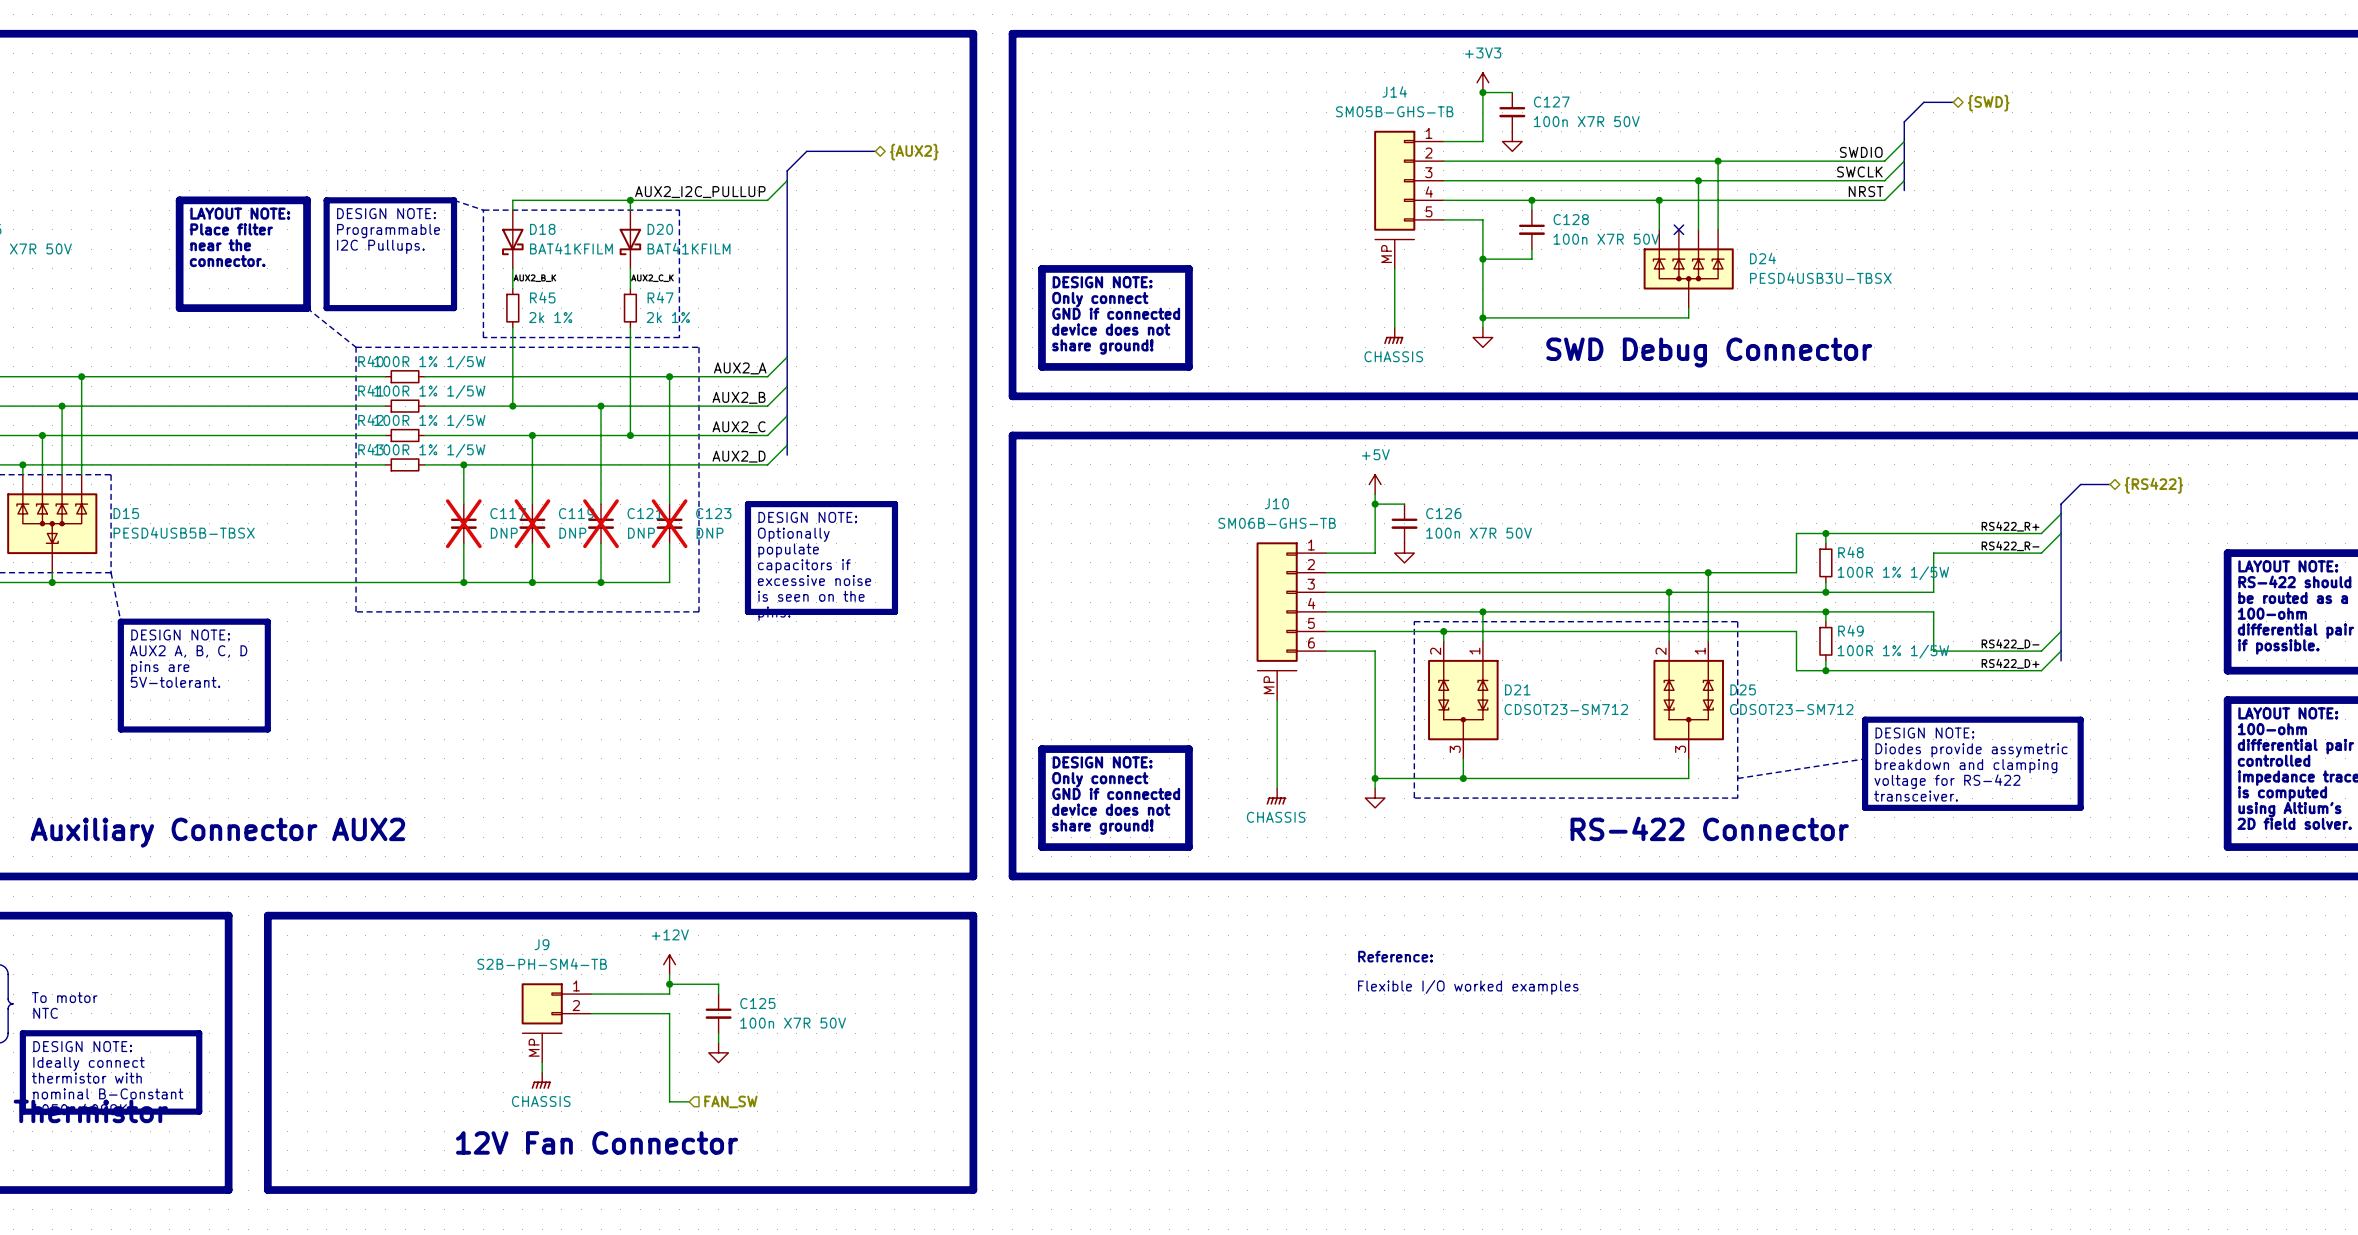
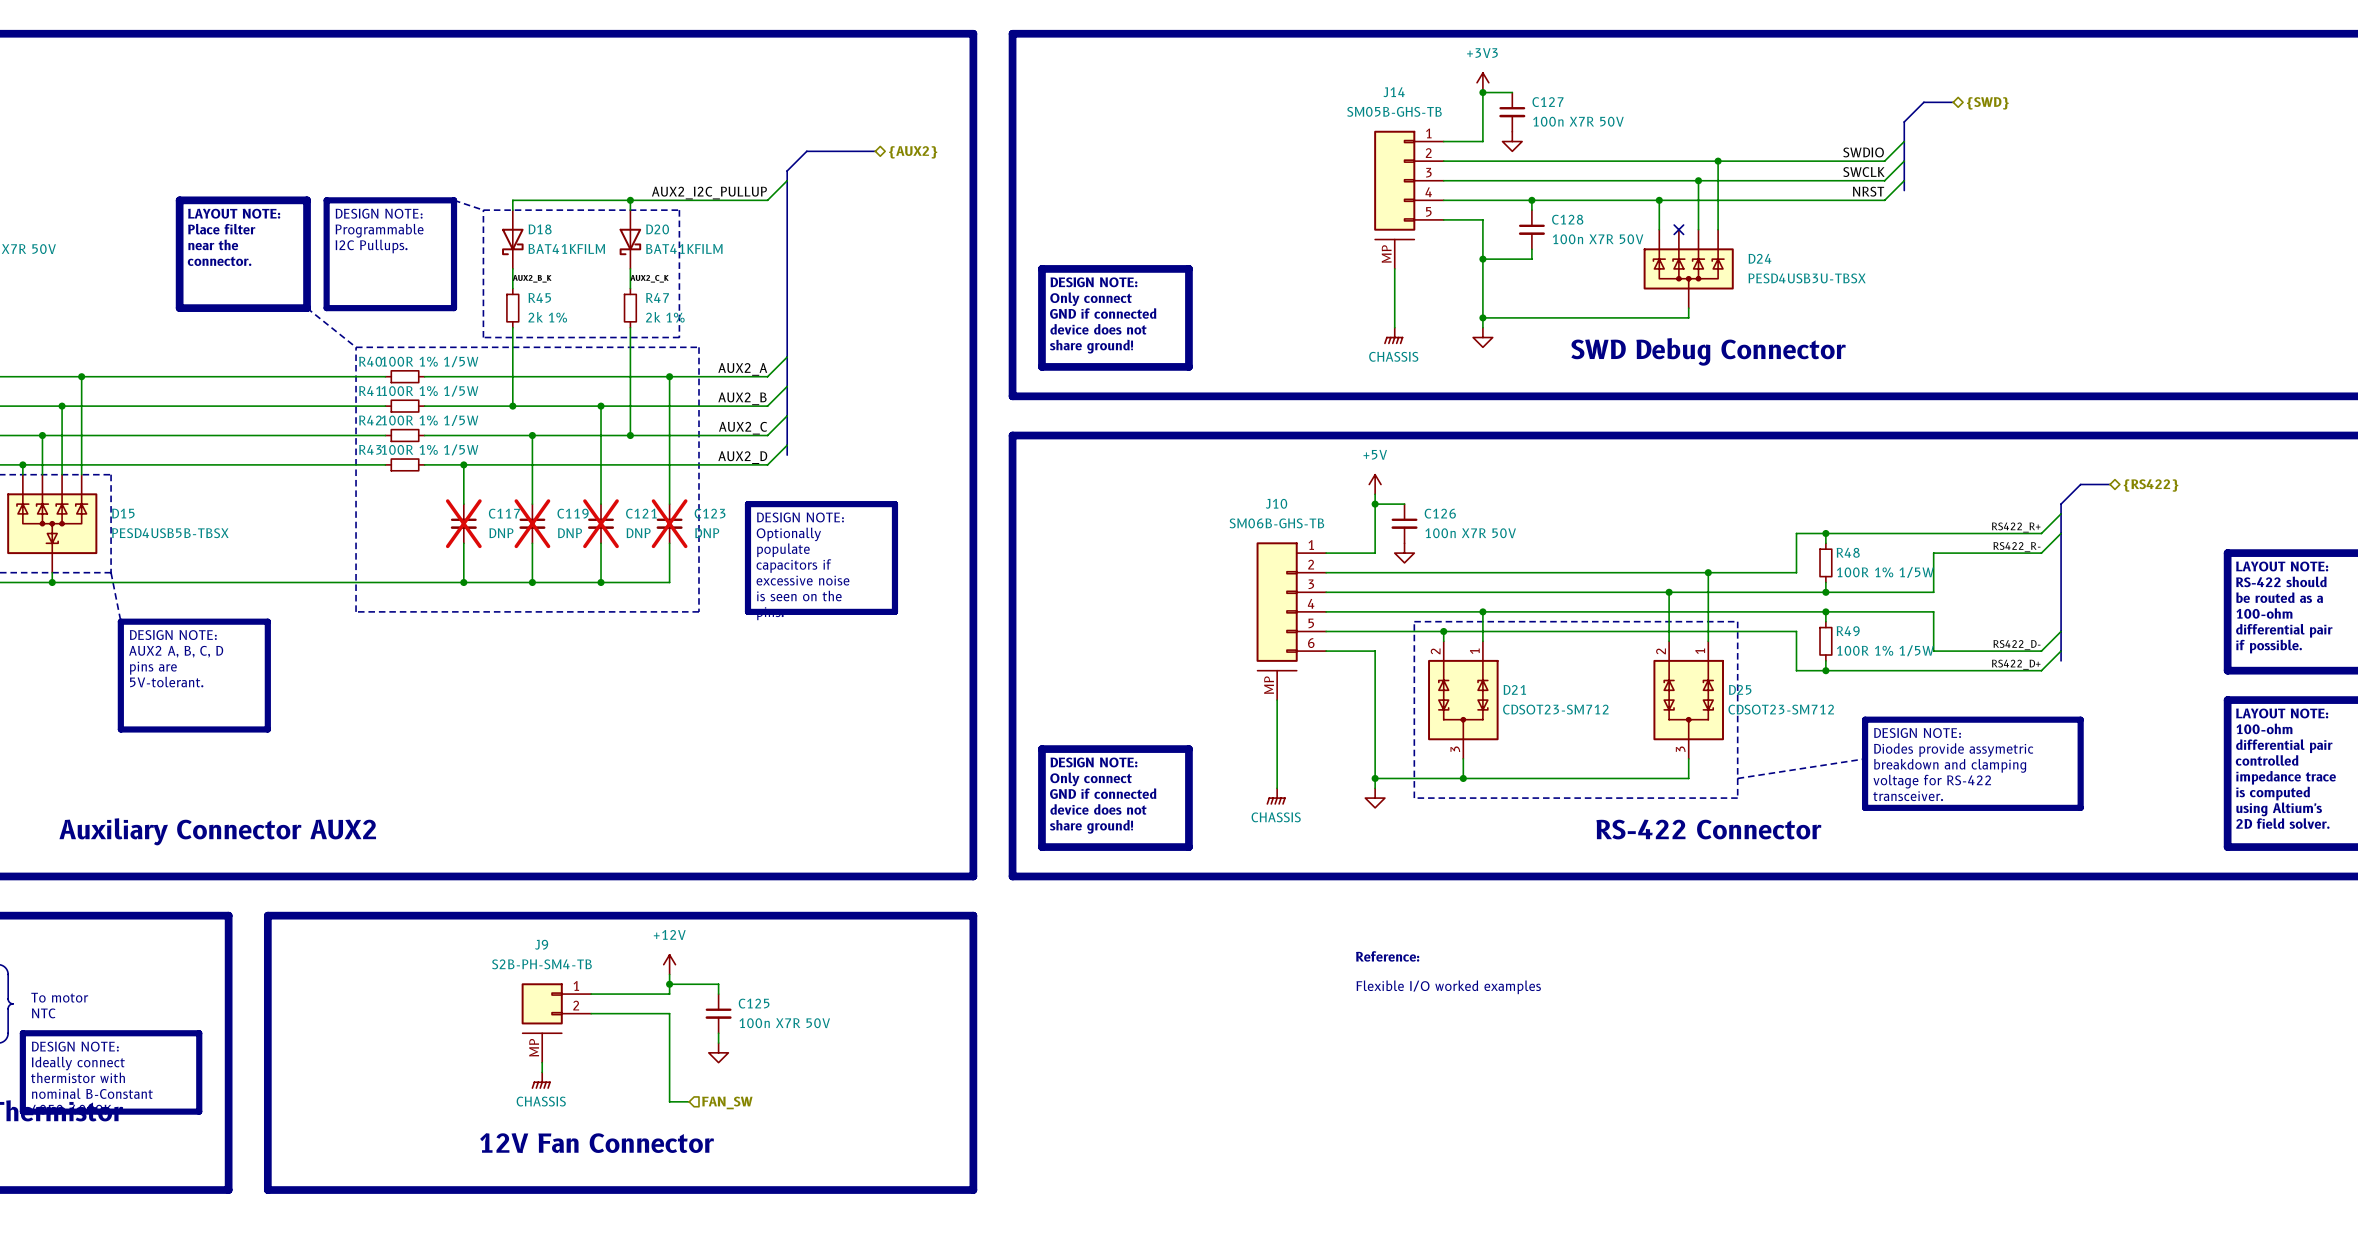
J10 symbol: [1256, 542, 1327, 701] -> [1256, 542, 1327, 701]

